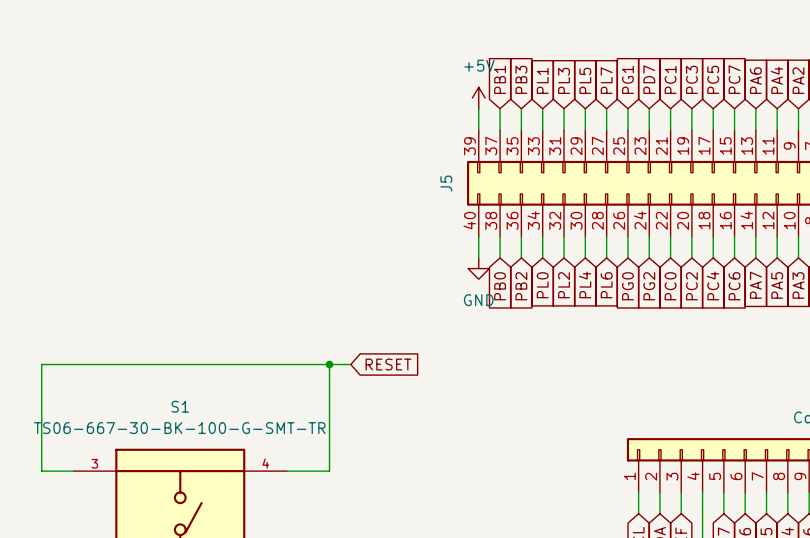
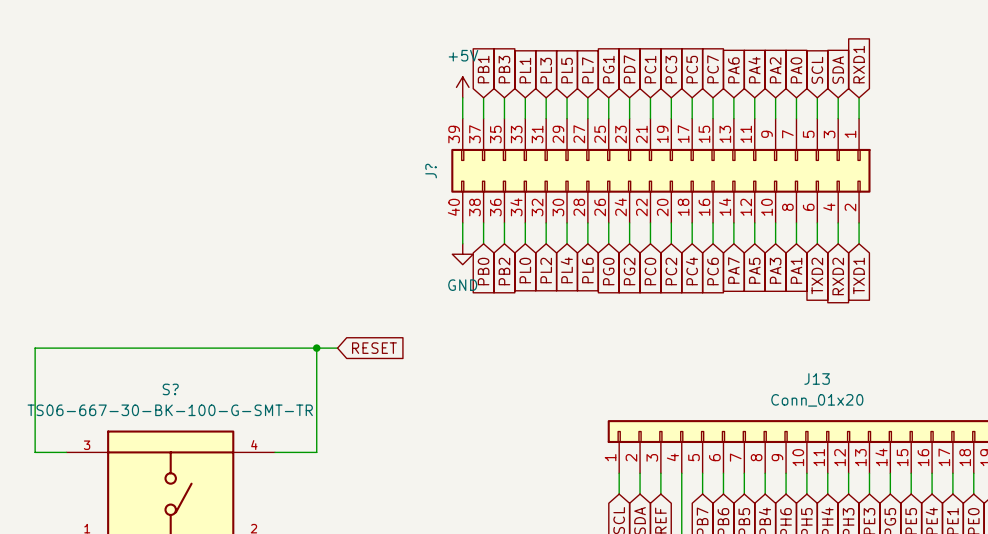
J5 name: J5 (446, 183) -> J? (431, 171)
S1 name: S1 (180, 406) -> S? (170, 389)

